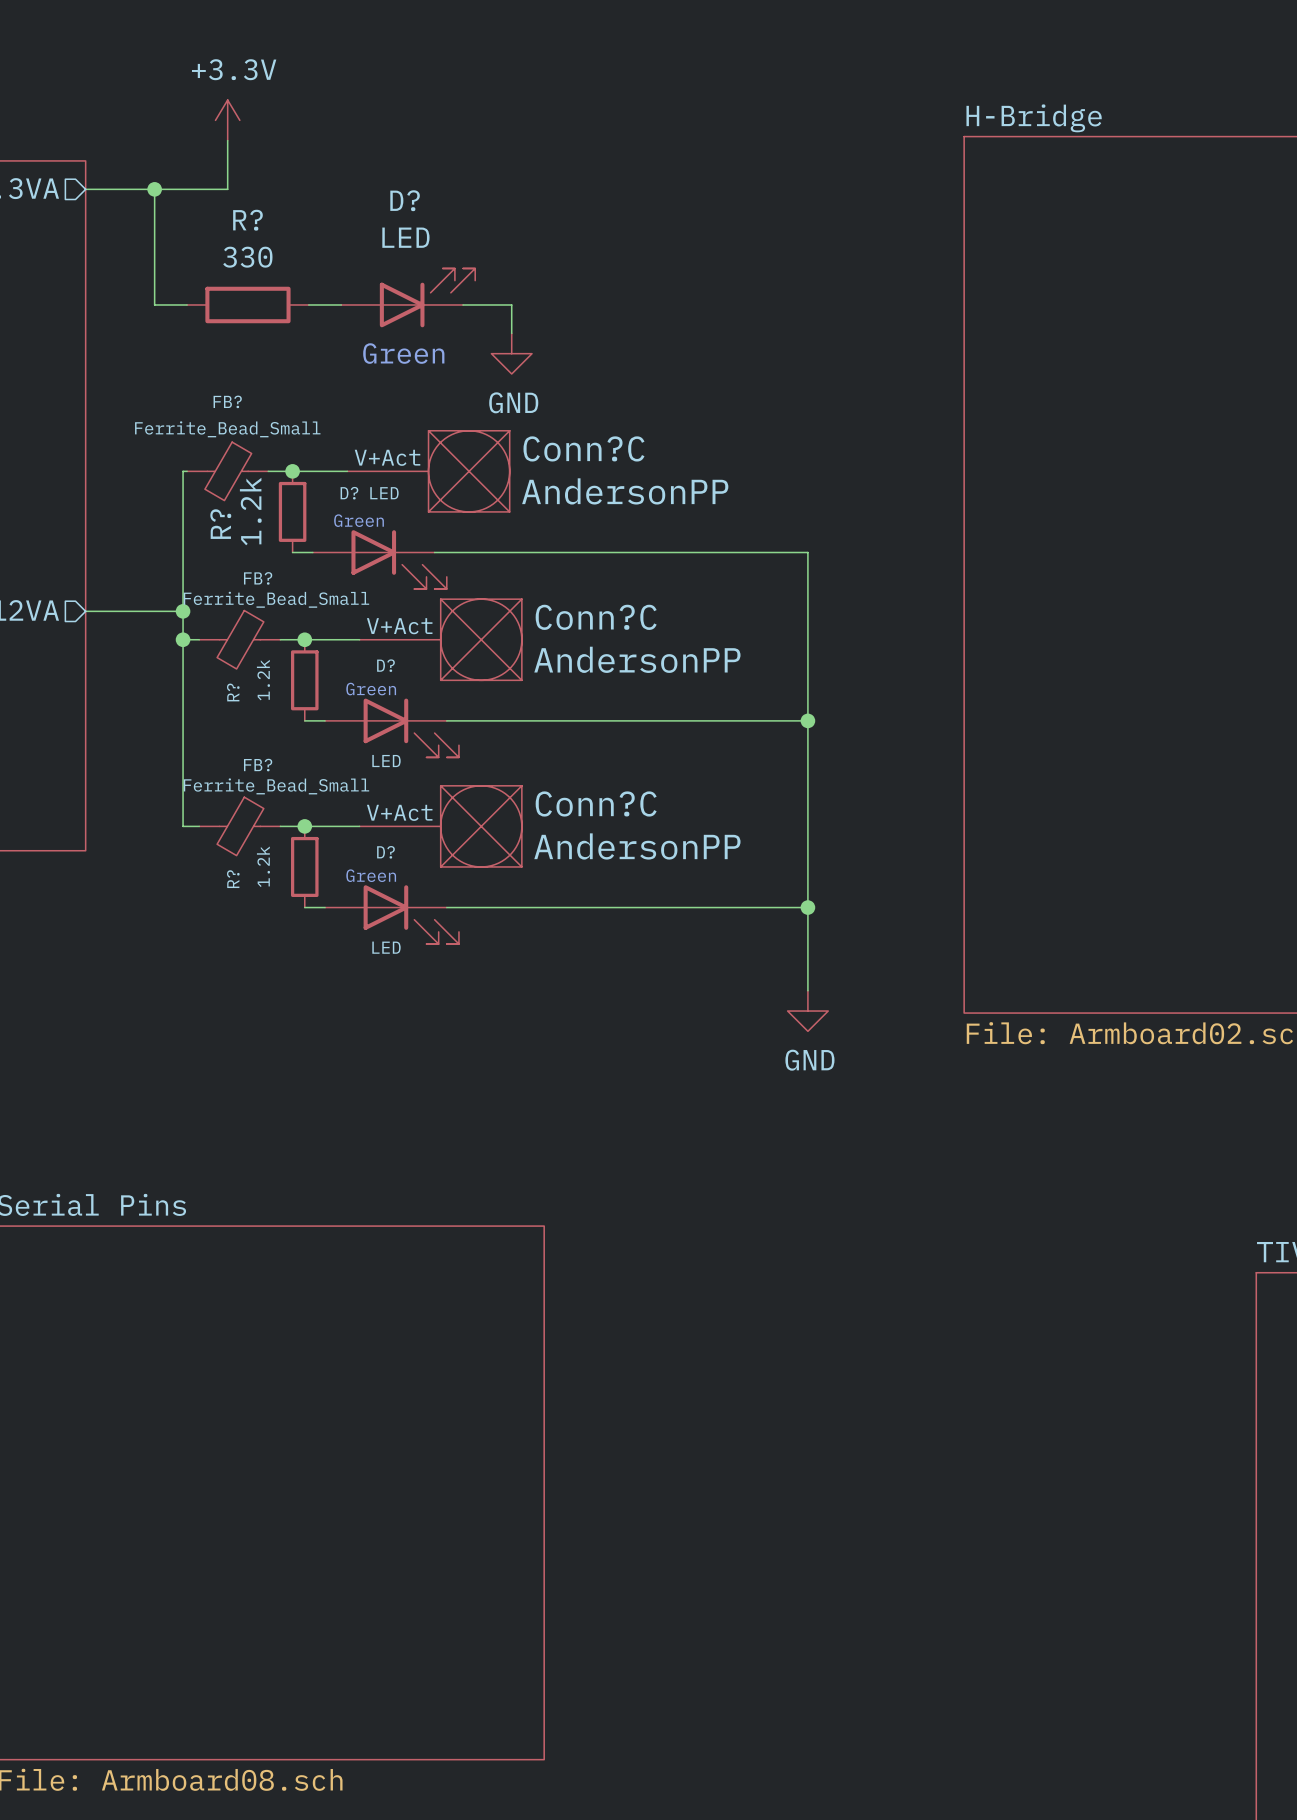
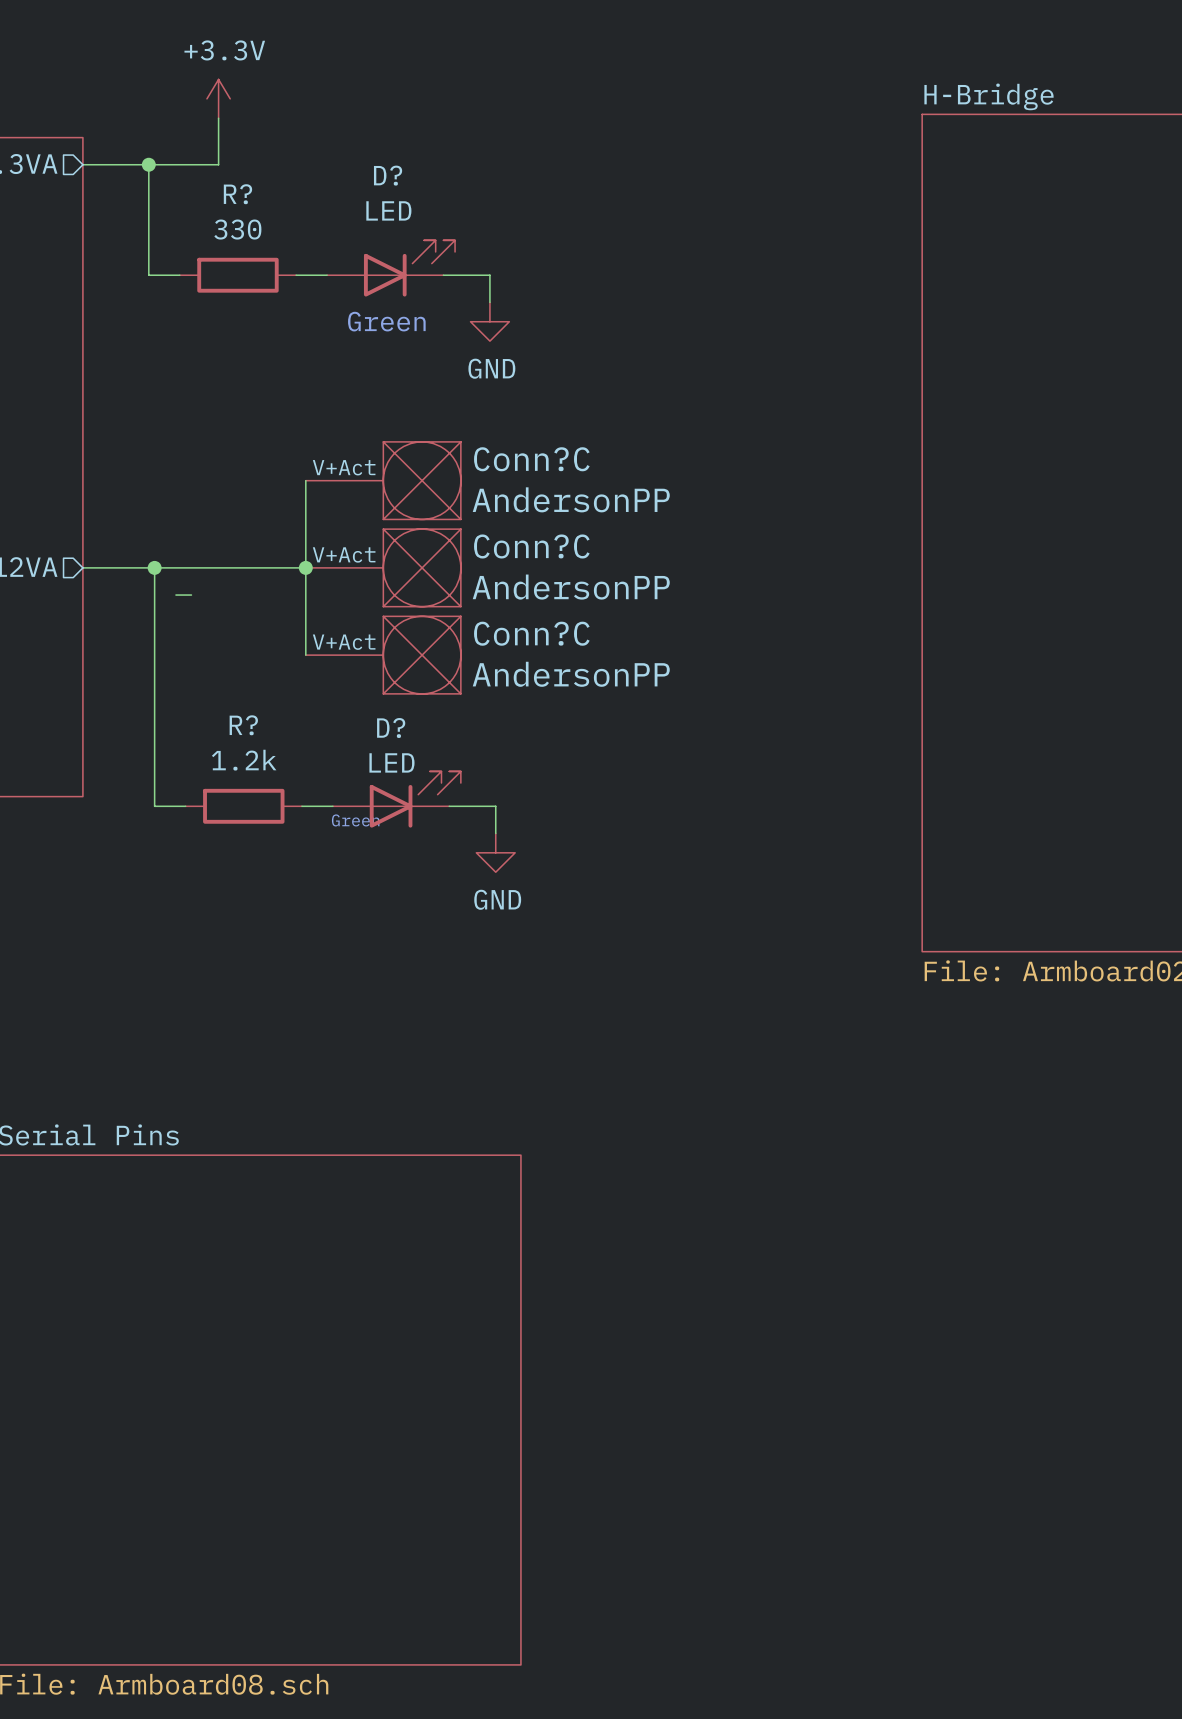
wire: (187, 471) (183, 471) (183, 826) (199, 826) -> none
FB?: Ferrite_Bead_Small (227, 471) -> none
wire: (268, 471) (347, 471) -> none
junction: (292, 471) -> none
Conn?C position: (428, 471) -> (383, 480)
R?: 1.2k (292, 511) -> none
wire: none -> (305, 480) (305, 655)
text: Green (359, 520) -> none
wire: (292, 552) (312, 552) -> none
wire: (434, 552) (807, 552) (807, 990) -> none
D?: LED (379, 559) -> none
wire: none -> (154, 567) (154, 806) (185, 806)
junction: none -> (154, 567)
wire: none -> (175, 567) (305, 567)
junction: (183, 611) -> none
Conn?C: none -> AndersonPP (383, 567)
junction: (183, 639) -> none
FB?: Ferrite_Bead_Small (239, 639) -> none
wire: (280, 639) (359, 639) -> none
junction position: (304, 639) -> (305, 567)
Conn?C: AndersonPP (440, 639) -> none
R?: 1.2k (304, 680) -> none
text: Green (371, 689) -> none
Conn?C: none -> AndersonPP (383, 655)
wire: (304, 720) (325, 720) -> none
wire: (446, 720) (807, 720) -> none
junction: (807, 720) -> none
D?: LED (392, 728) -> none
FB?: Ferrite_Bead_Small (239, 826) -> none
wire: (280, 826) (359, 826) -> none
junction: (304, 826) -> none
Conn?C: AndersonPP (440, 826) -> none
D?: none -> LED (396, 799)
R?: none -> 1.2k (243, 806)
wire: none -> (301, 806) (332, 806)
wire: none -> (449, 806) (495, 806) (495, 833)
R?: 1.2k (304, 866) -> none
wire: (304, 907) (325, 907) -> none
wire: (446, 907) (807, 907) -> none
junction: (807, 907) -> none
D?: LED (392, 914) -> none
power symbol position: GND (807, 1011) -> GND (495, 852)

